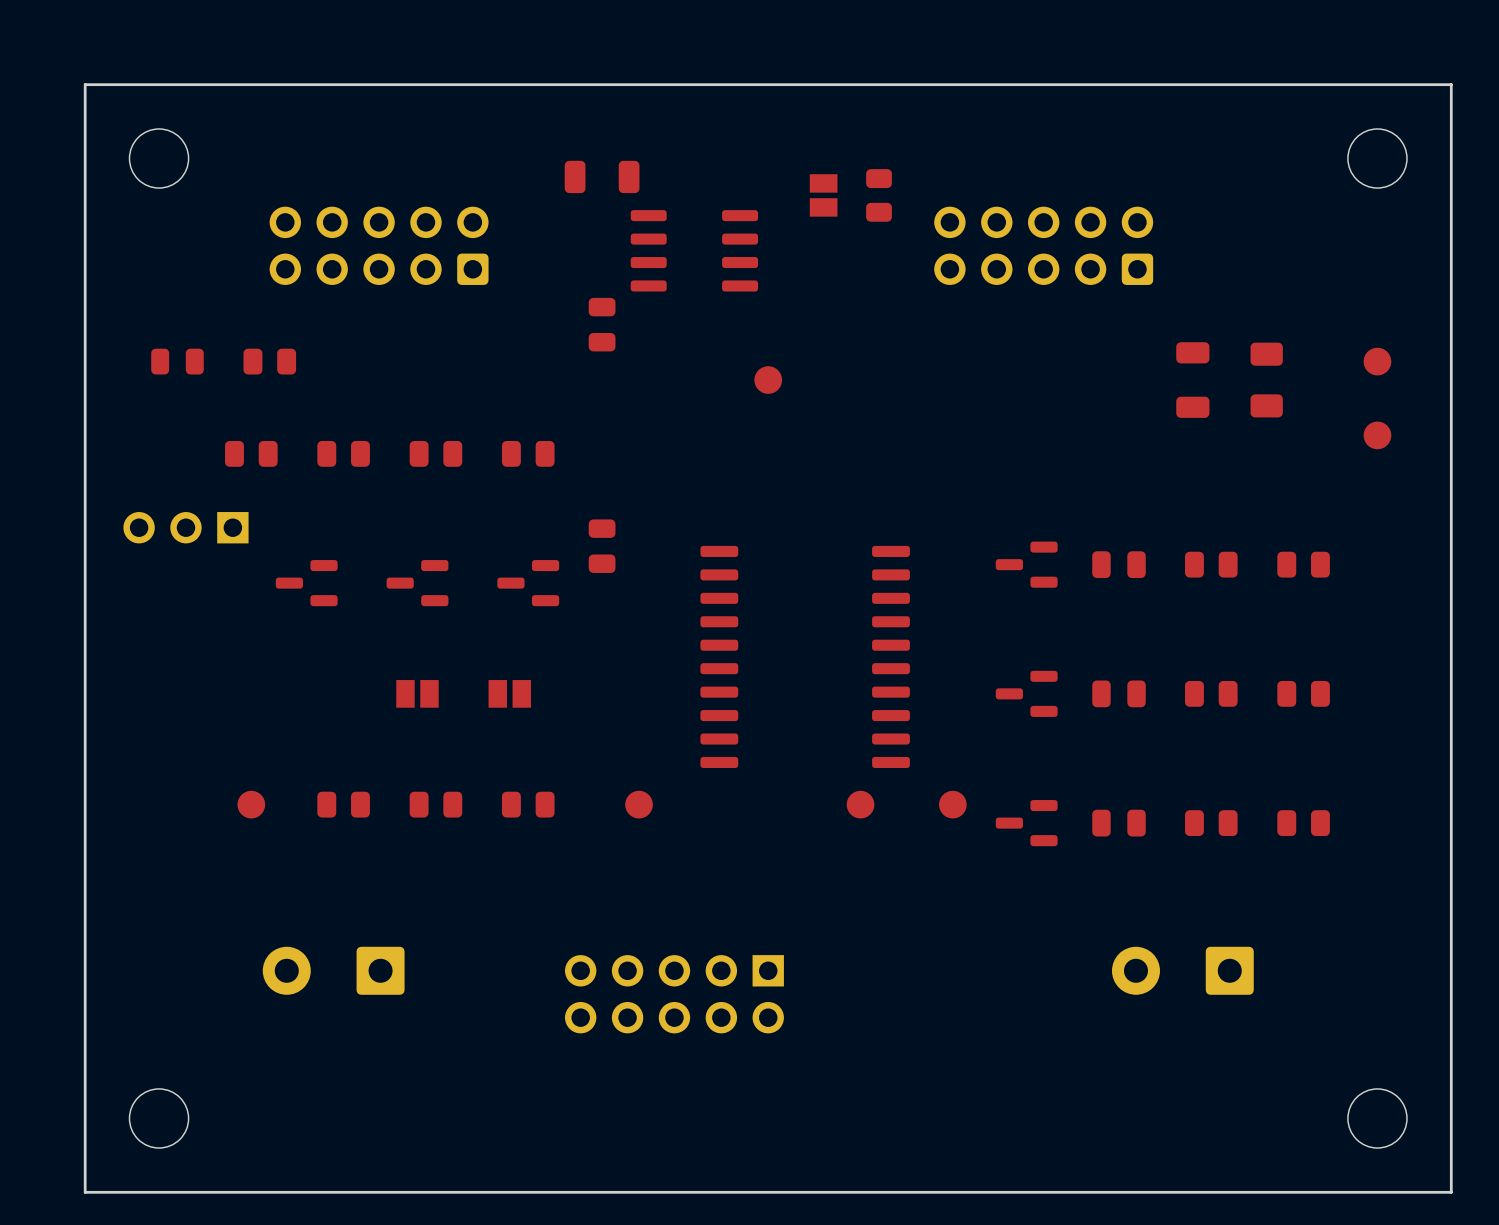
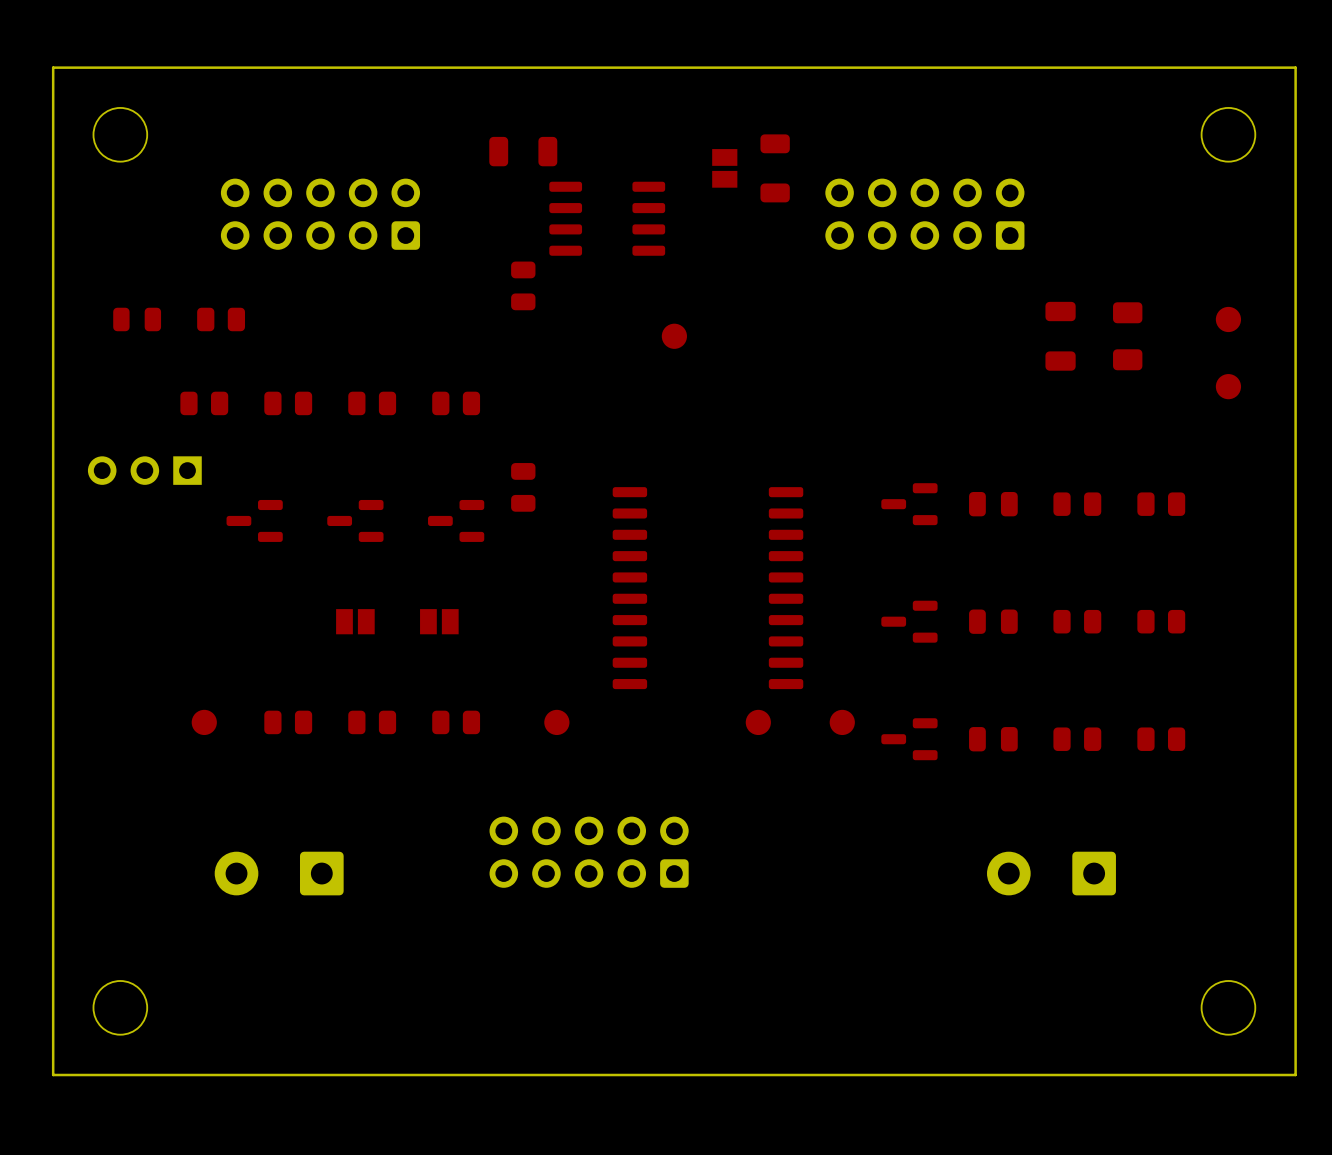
part footprint: [866, 169, 892, 222] -> [760, 134, 790, 203]
part: none -> (589, 852)
part: (674, 994) -> none

